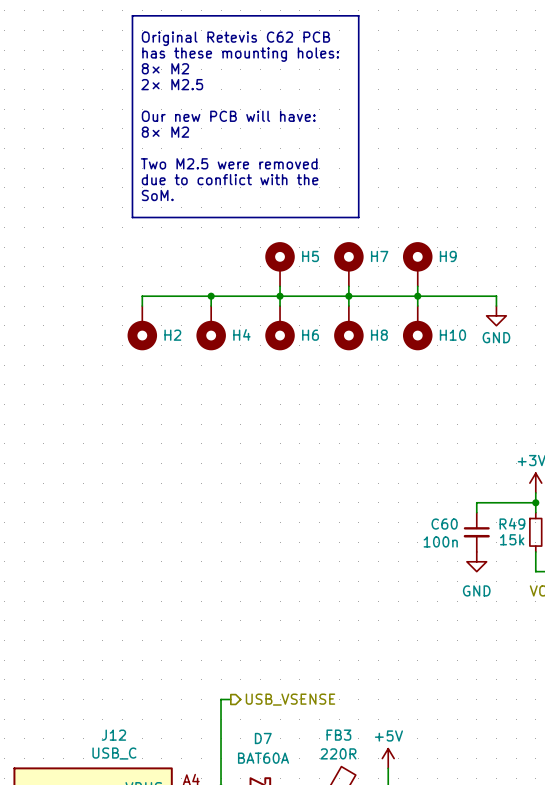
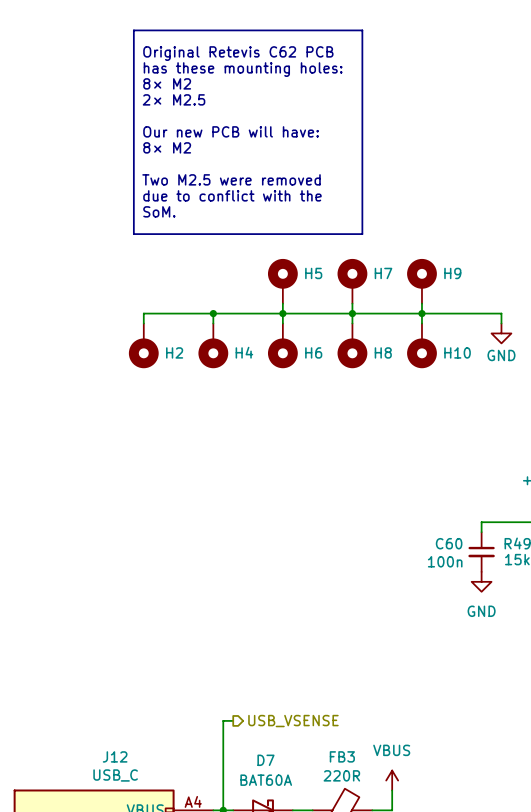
power symbol: +5V (388, 758) -> VBUS (392, 780)

